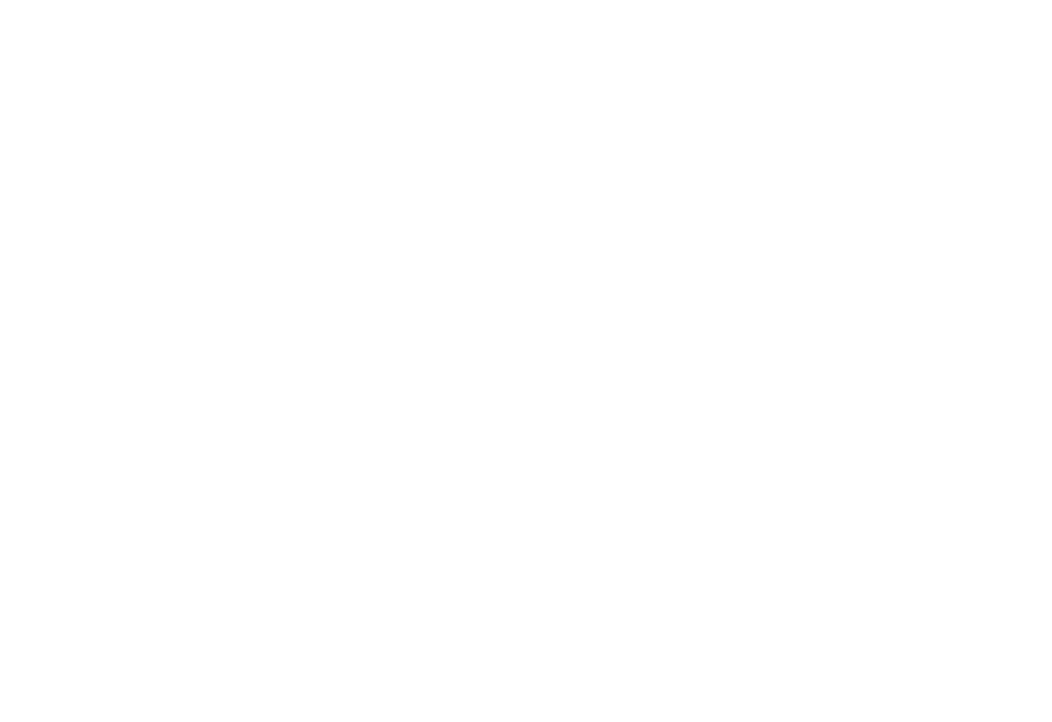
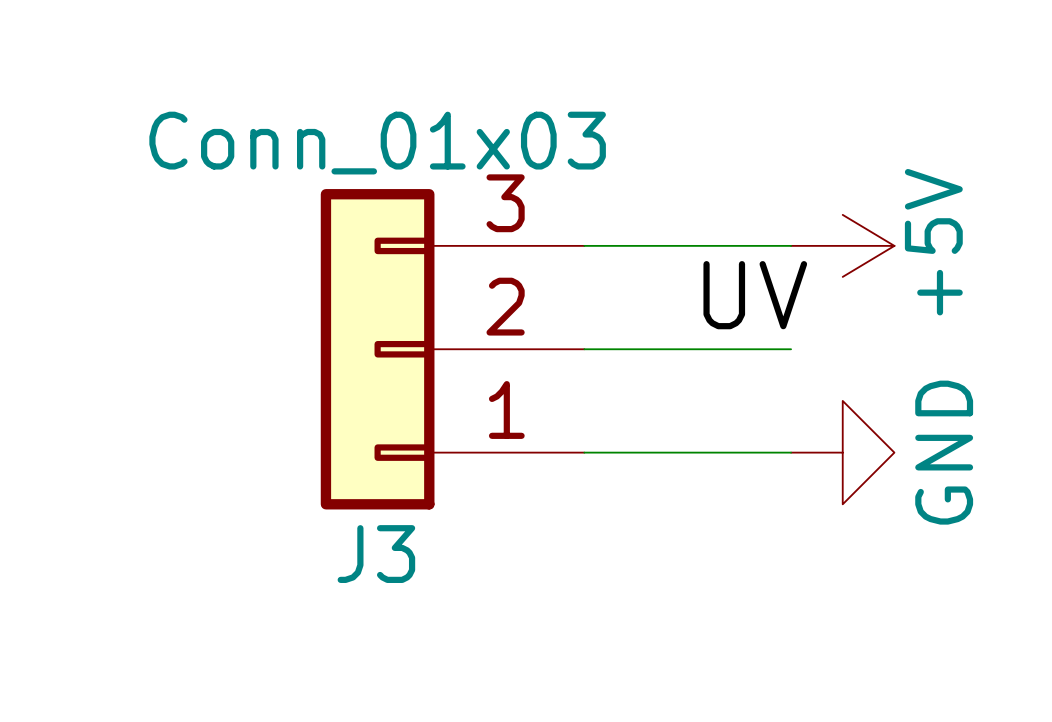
wire: none -> (584, 245) (791, 245)
power symbol: none -> +5V (842, 245)
label: none -> UV (755, 295)
J3: none -> Conn_01x03 (452, 349)
wire: none -> (584, 349) (791, 349)
wire: none -> (584, 452) (791, 452)
power symbol: none -> GND (842, 452)

